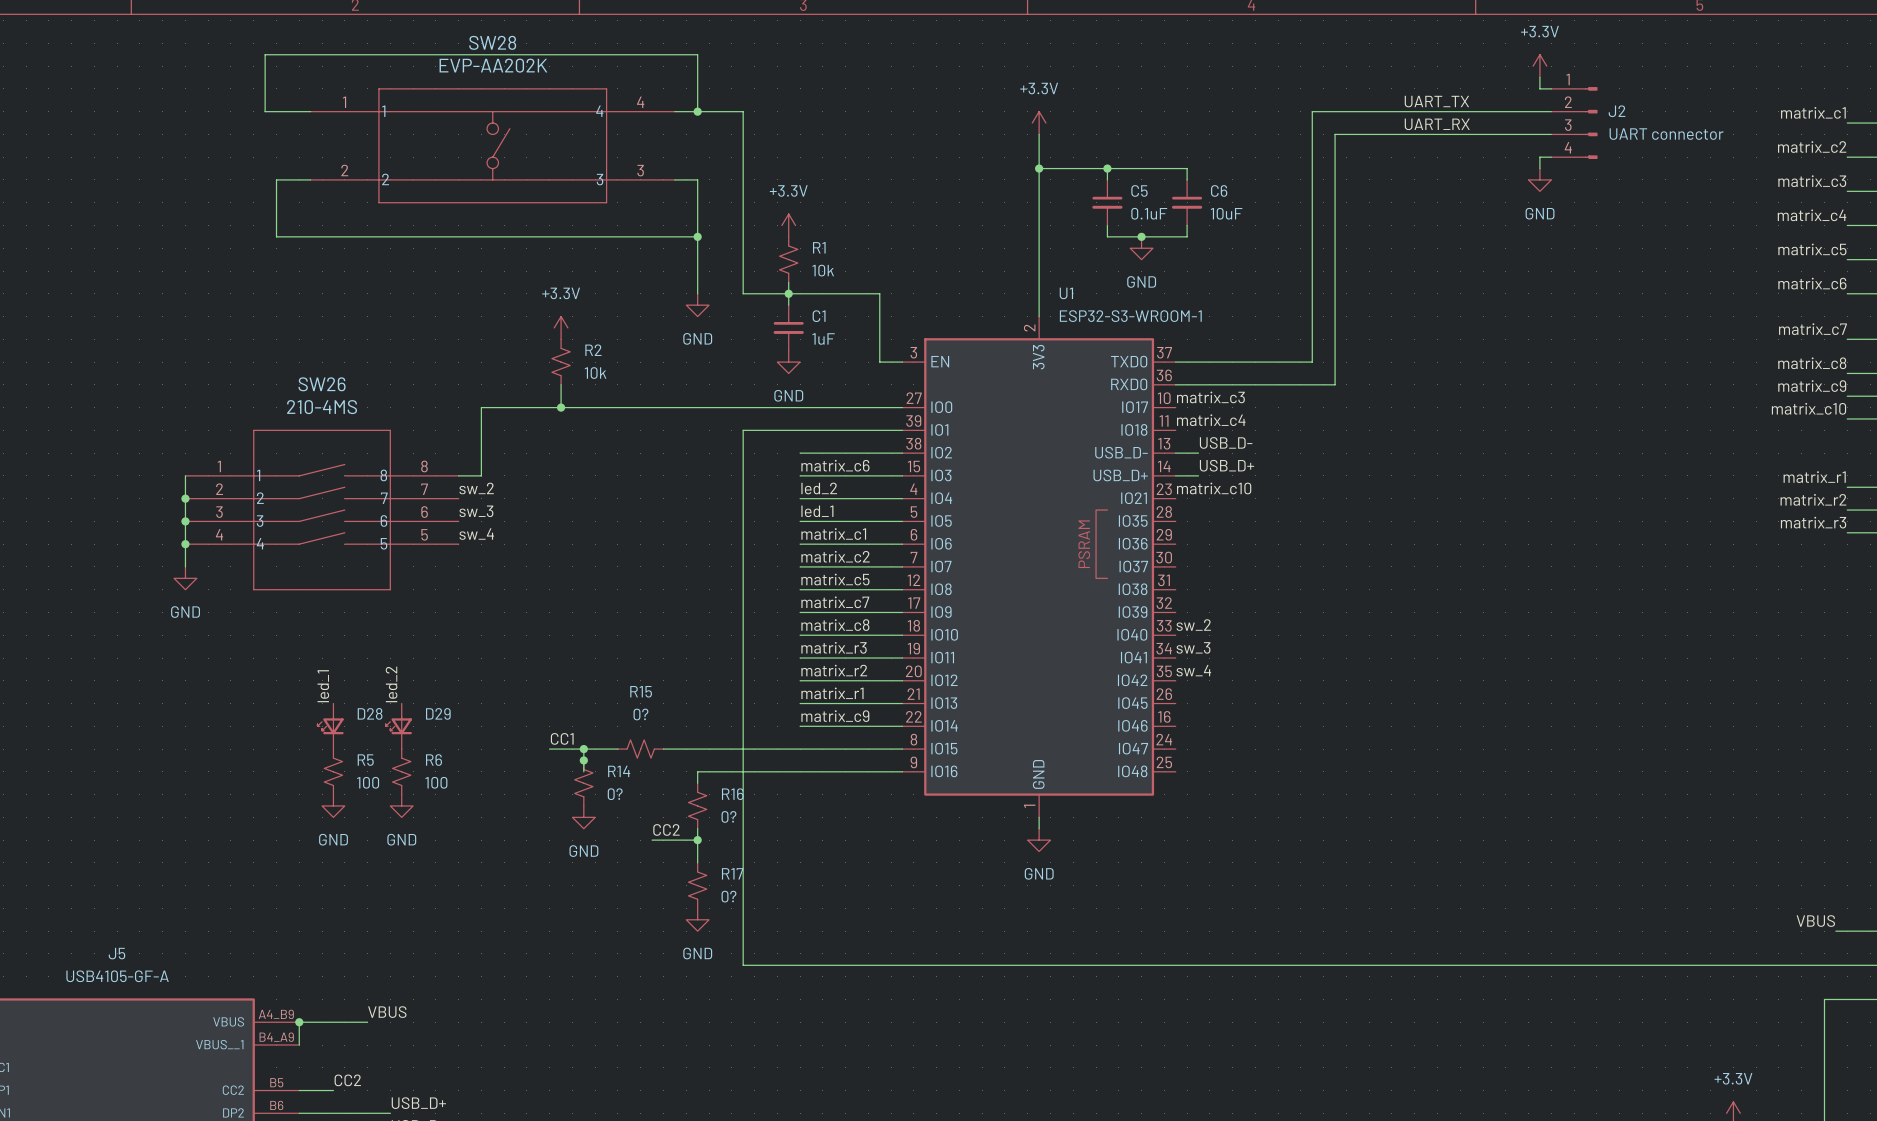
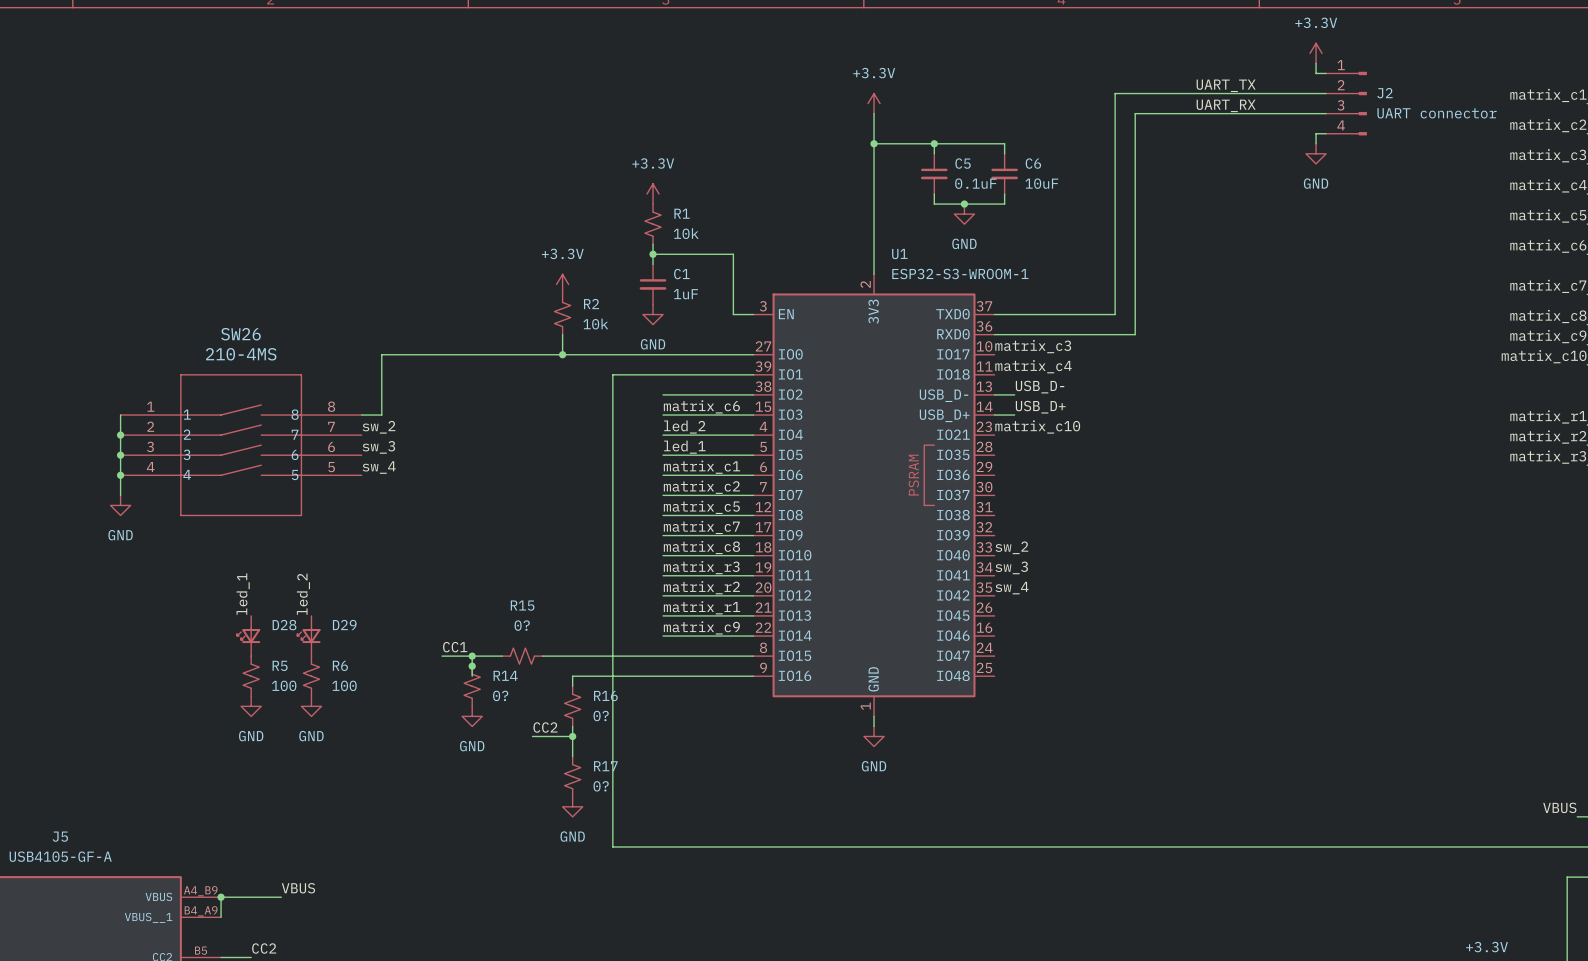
wire: (310, 111) (265, 111) (265, 54) (697, 54) (697, 111) -> none
wire: (674, 111) (743, 111) (743, 293) (788, 293) -> none
junction: (697, 111) -> none
SW28: EVP-AA202K (492, 145) -> none
wire: (310, 179) (276, 179) (276, 236) (697, 236) -> none
wire: (674, 179) (697, 179) (697, 293) -> none
junction: (697, 236) -> none
power symbol: GND (697, 305) -> none
power symbol position: +3.3V (561, 327) -> +3.3V (562, 284)
R2 position: (561, 362) -> (562, 314)
wire: (561, 384) (561, 407) -> (562, 334) (562, 354)
junction: (561, 407) -> none
junction: none -> (562, 354)

